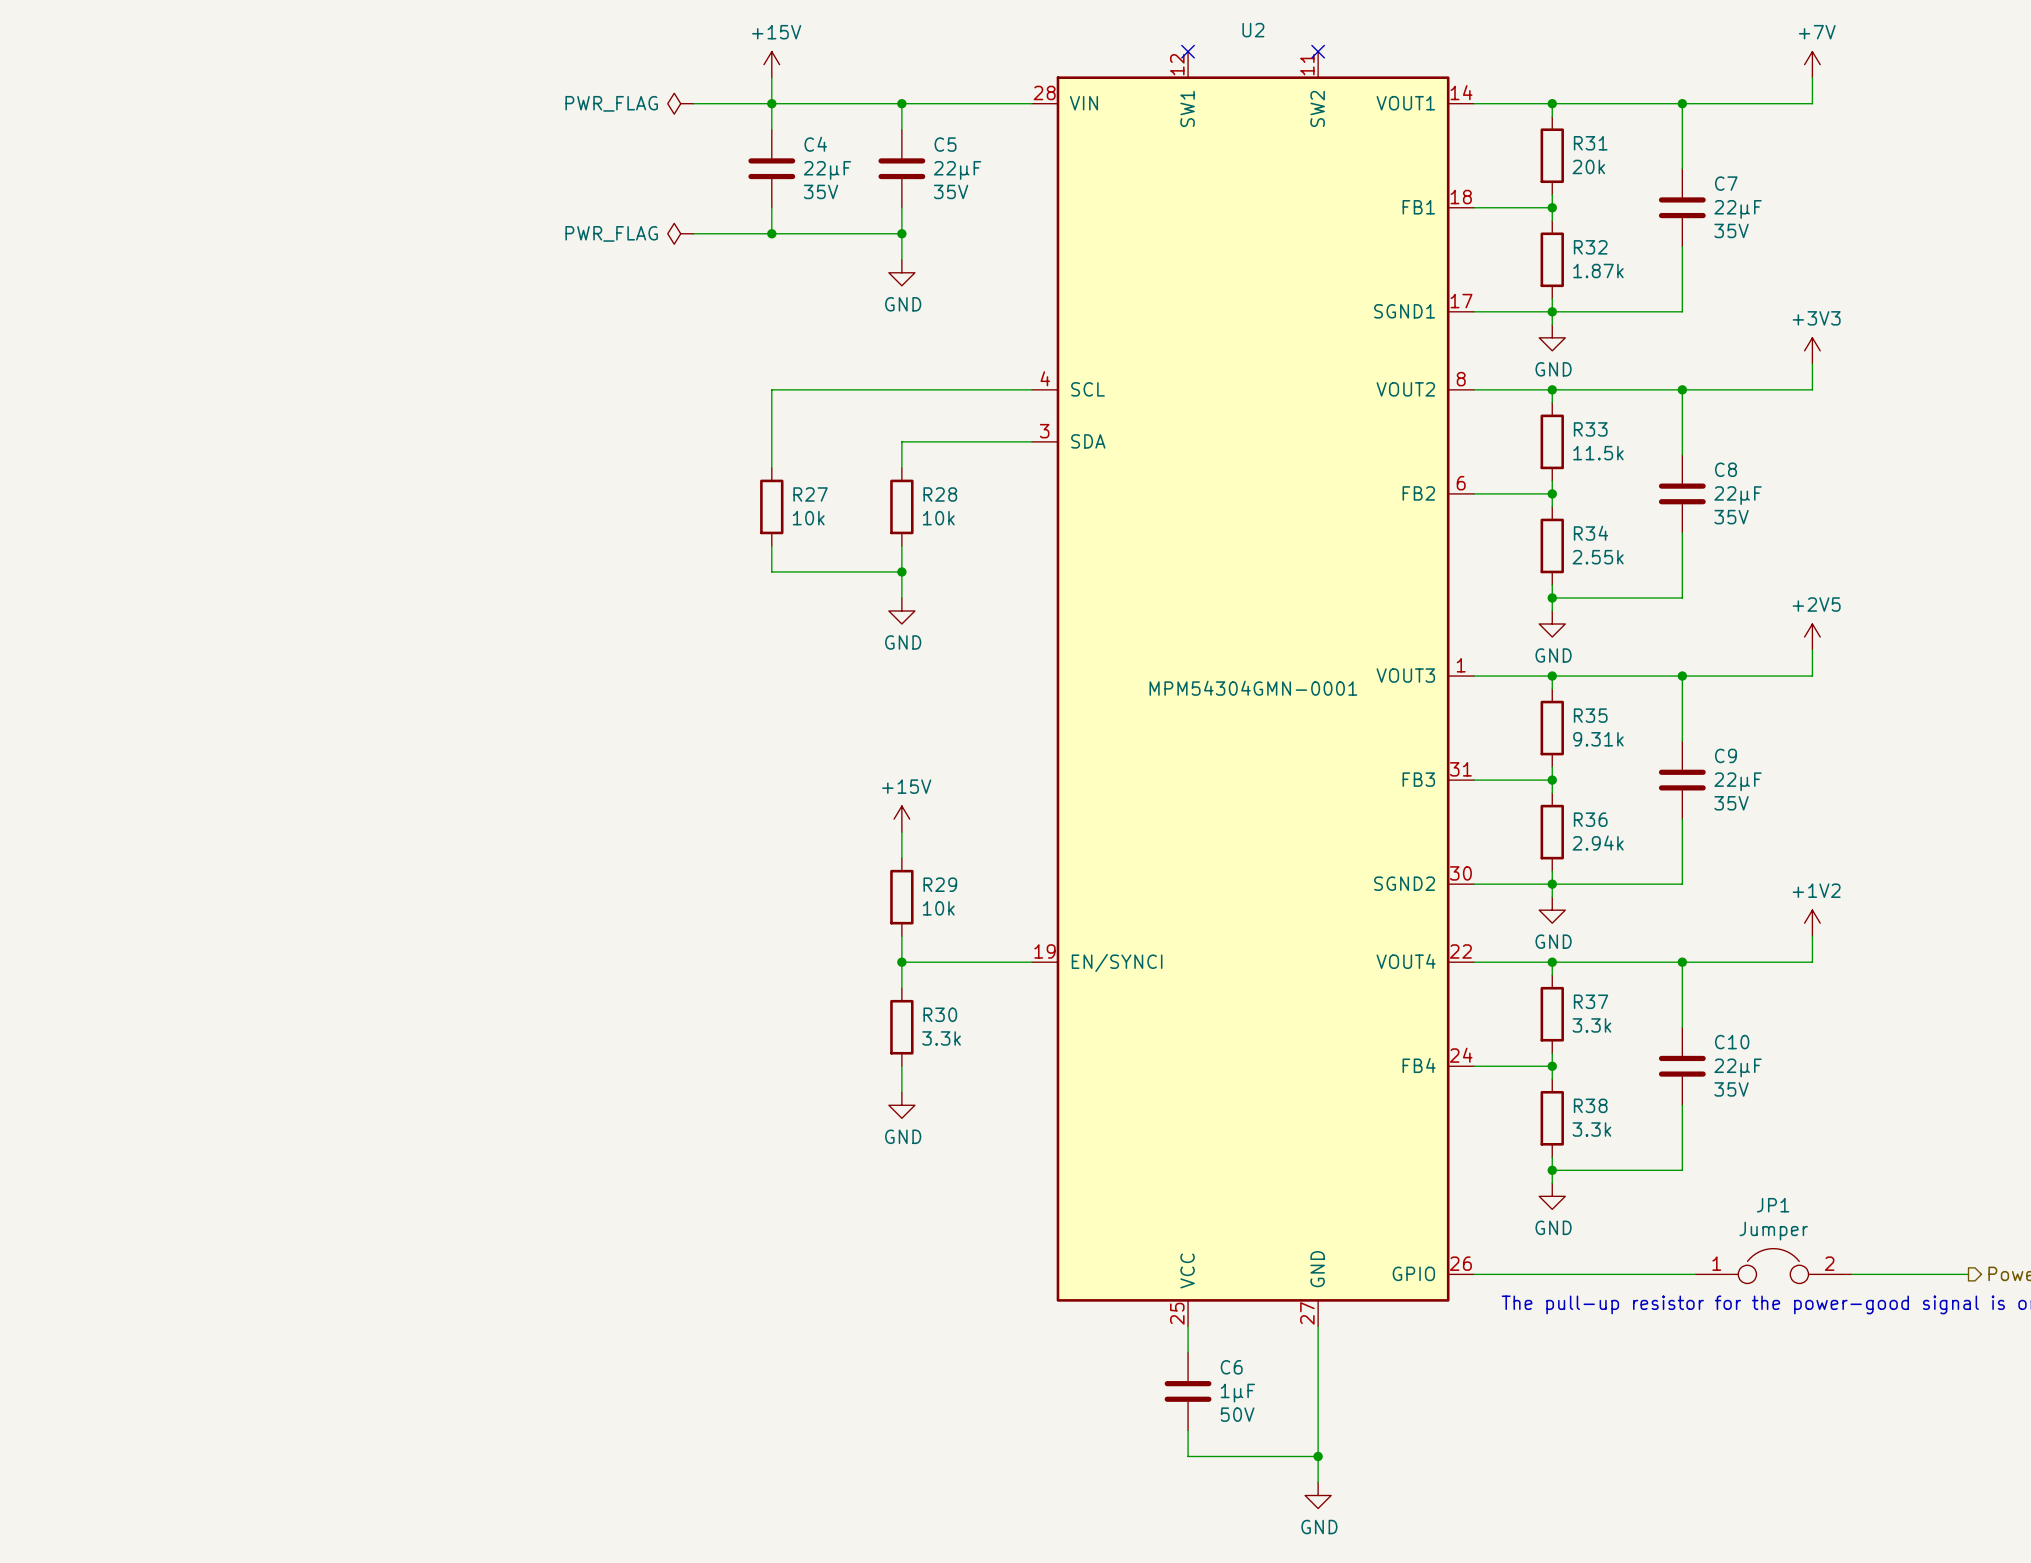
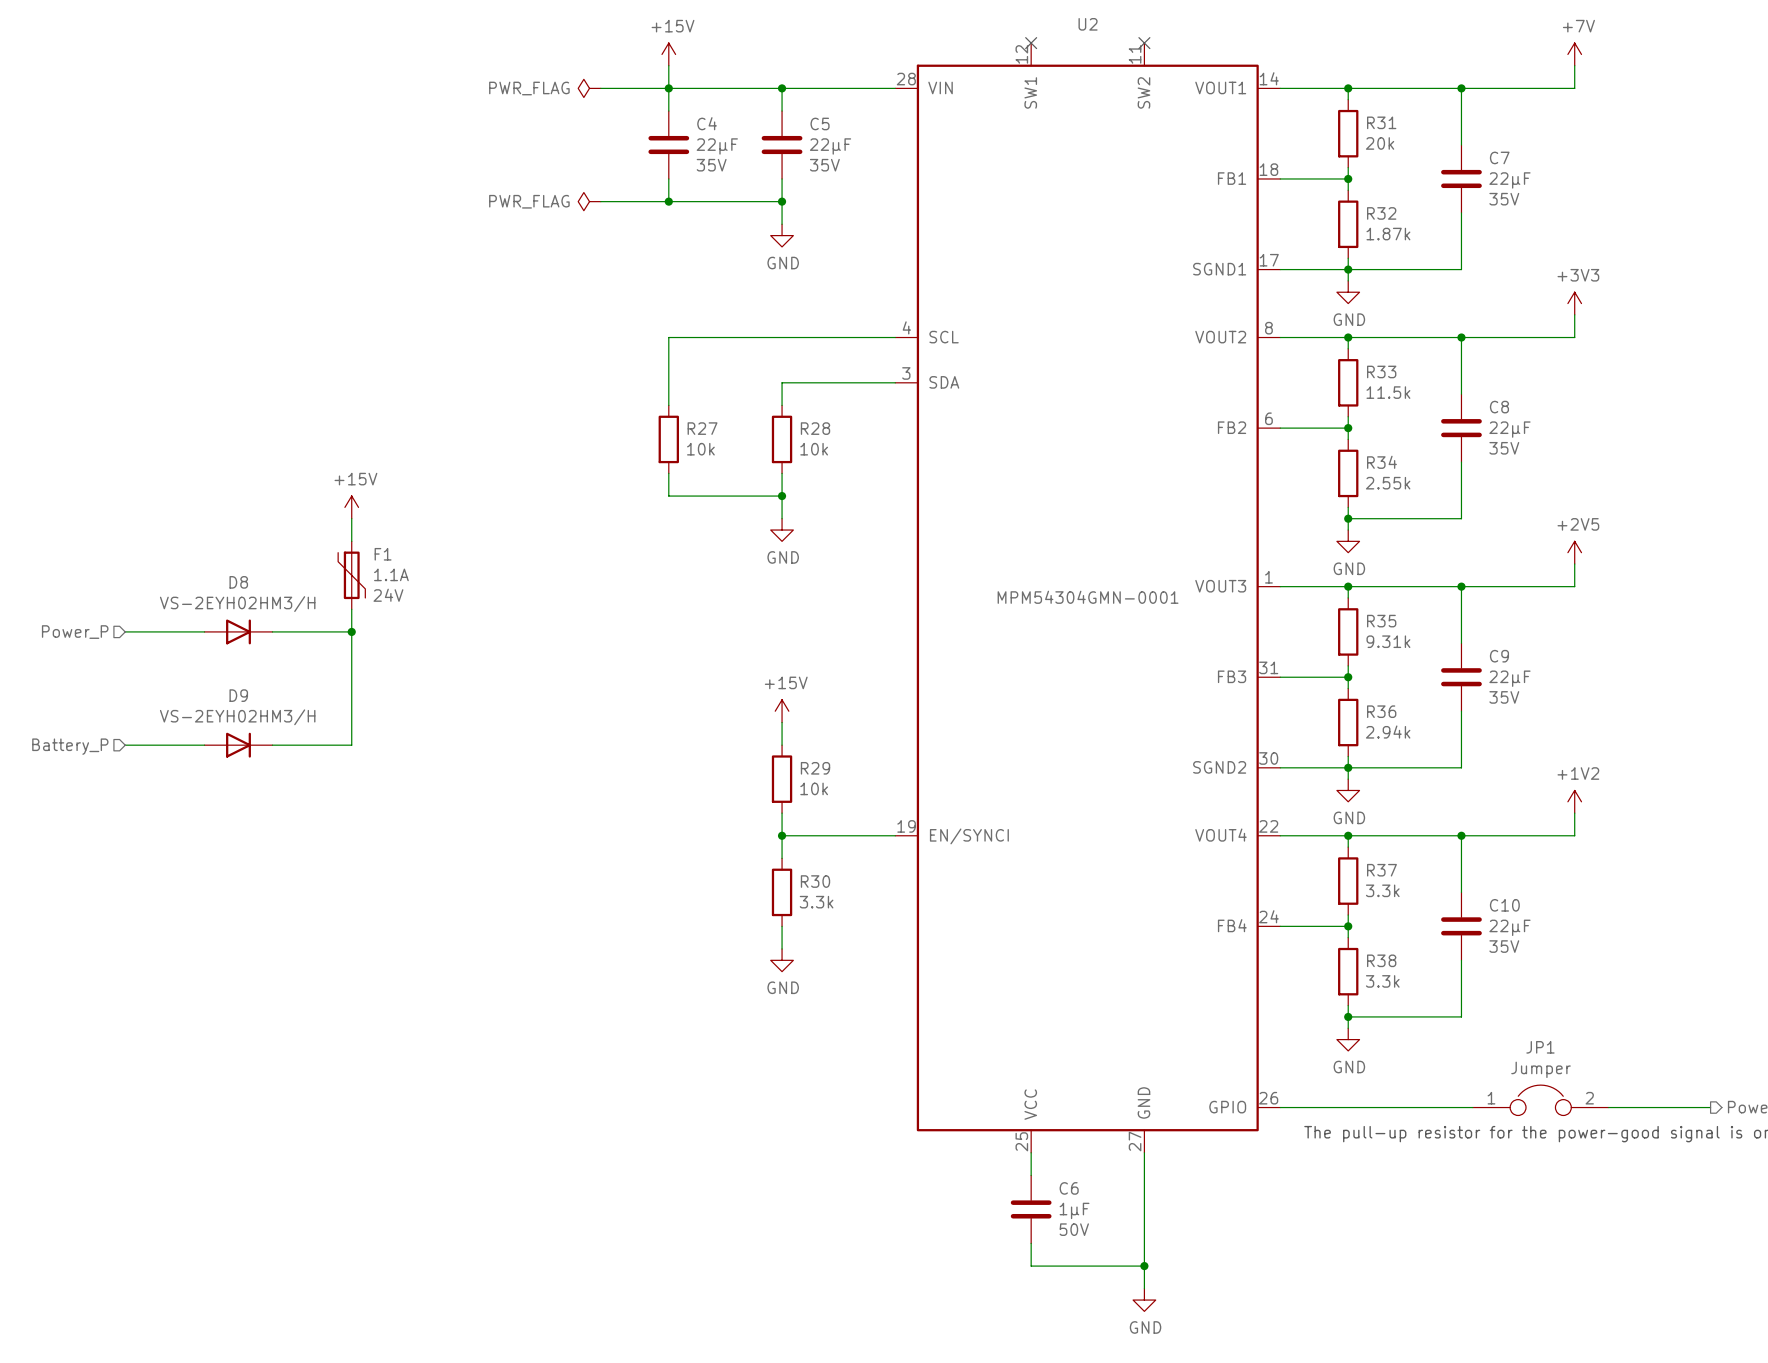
power symbol: none -> +15V (351, 507)
wire: none -> (351, 518) (351, 541)
F1: none -> 1.1A (351, 575)
wire: none -> (351, 609) (351, 745) (272, 745)
hierarchical label: none -> Power_P (75, 632)
wire: none -> (125, 631) (204, 631)
D8: none -> VS-2EYH02HM3/H (238, 631)
wire: none -> (272, 631) (351, 631)
junction: none -> (351, 631)
wire: none -> (125, 745) (204, 745)
D9: none -> VS-2EYH02HM3/H (238, 745)
hierarchical label: none -> Battery_P (70, 746)

